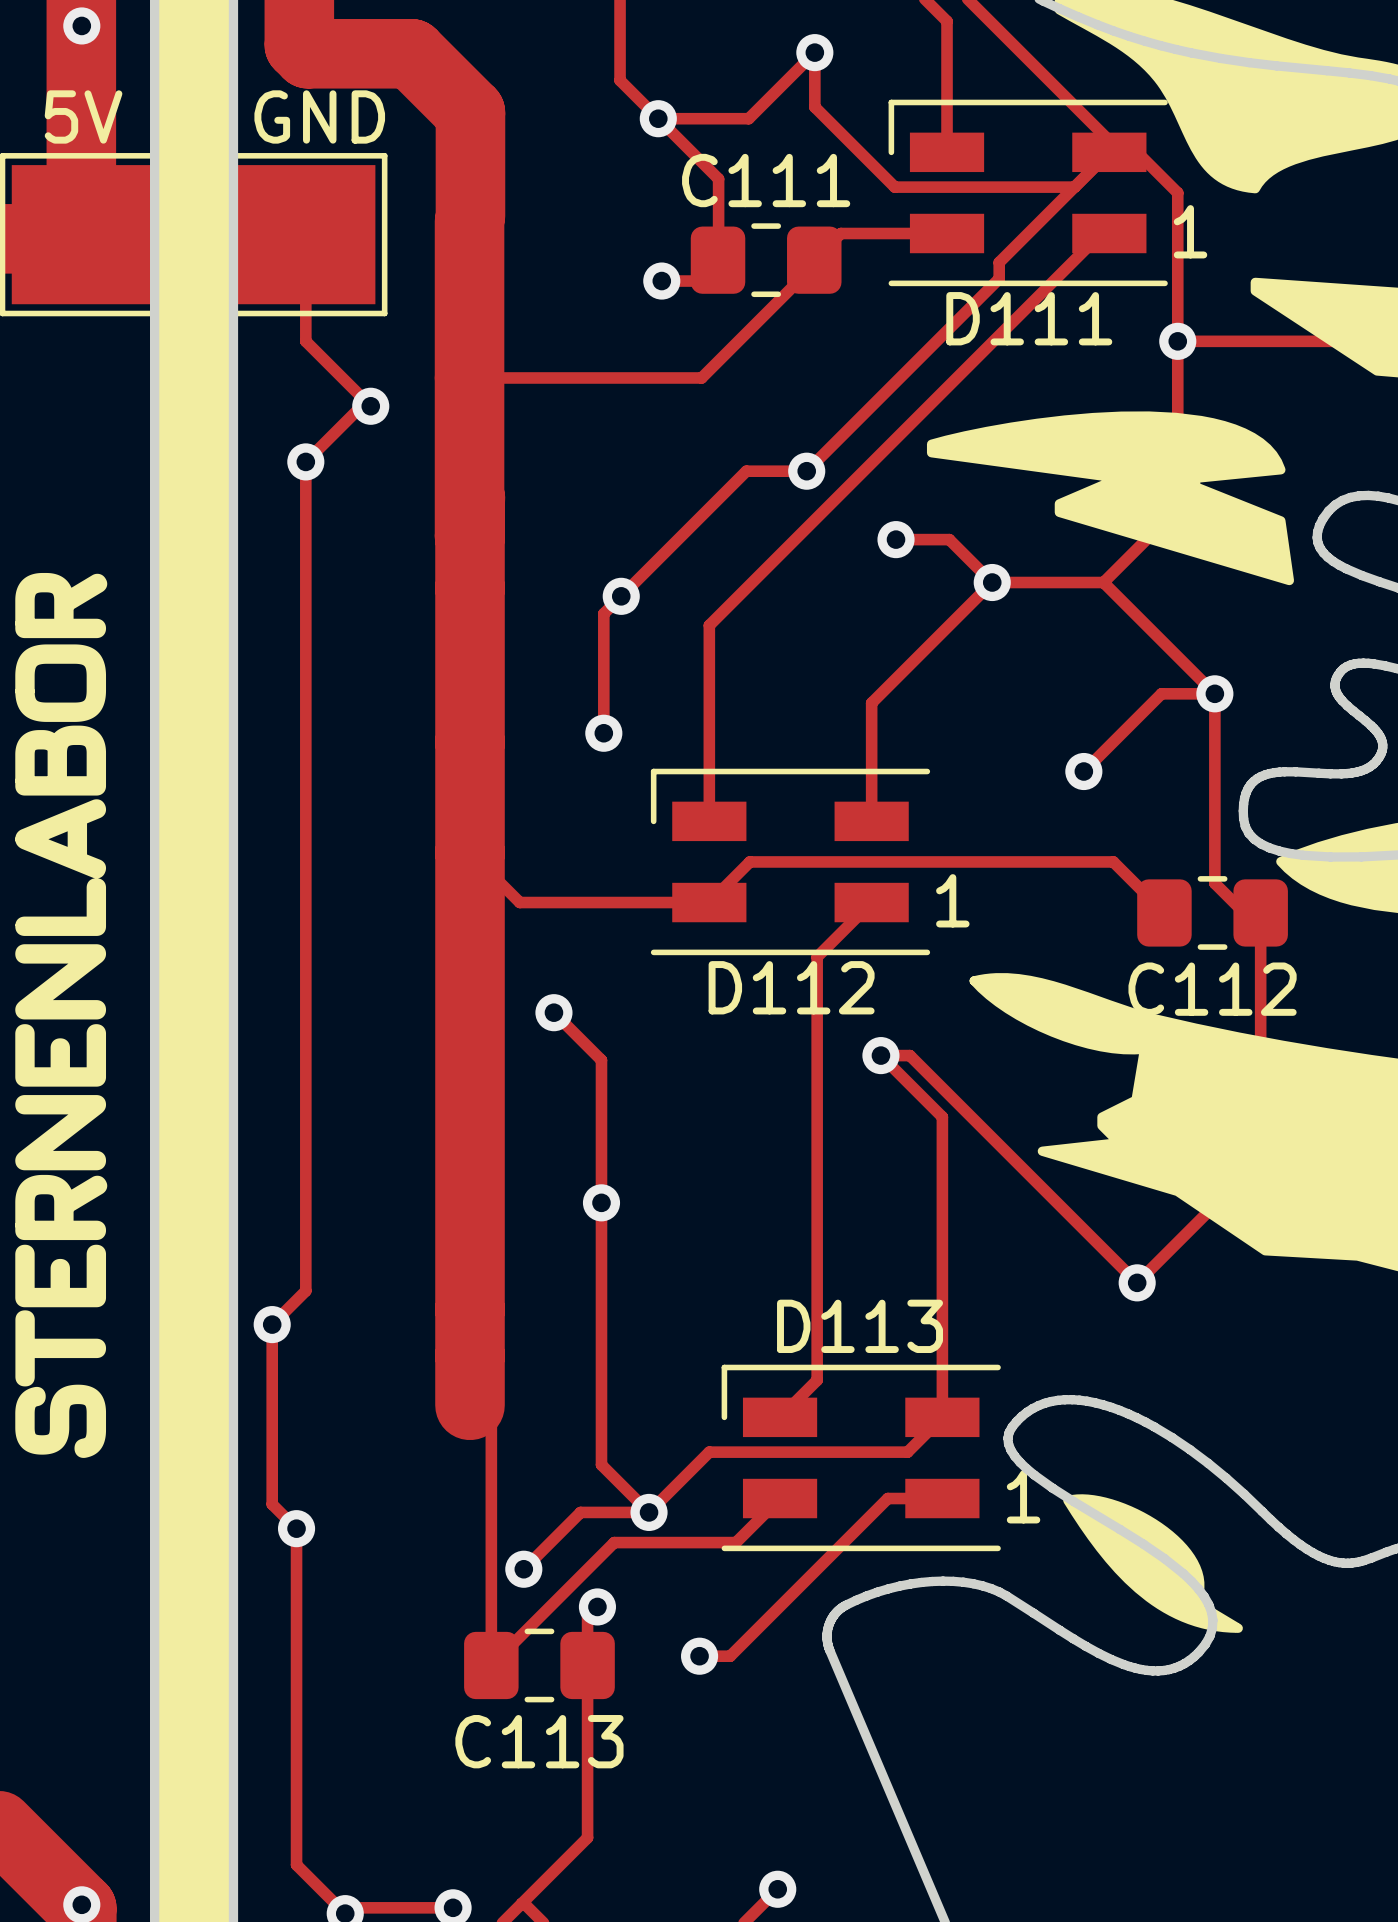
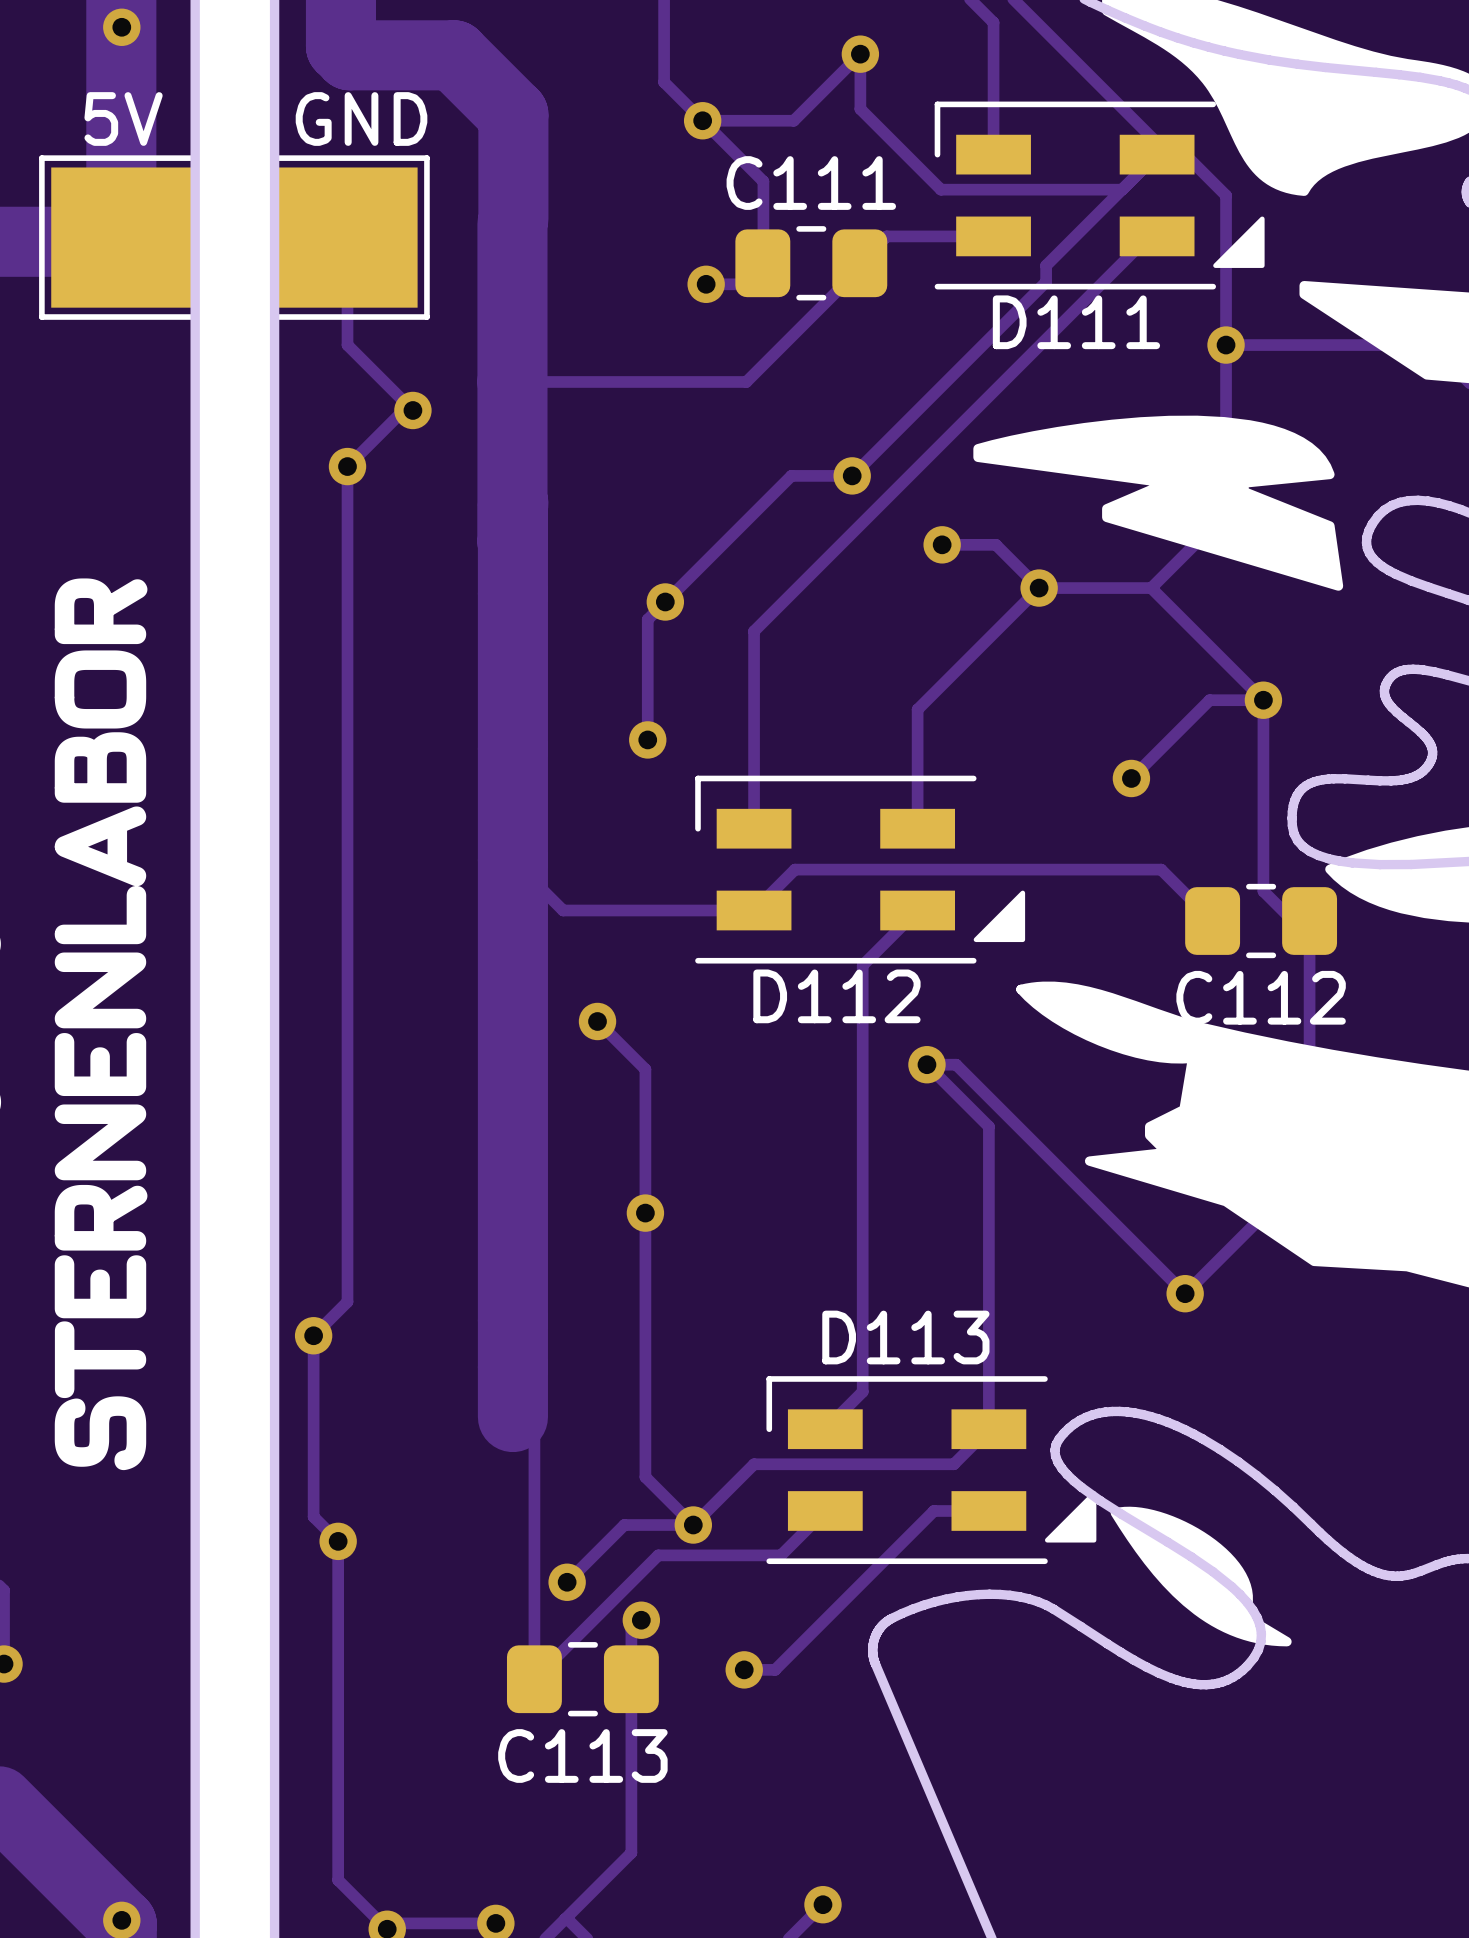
D111 footprint: [888, 99, 1168, 287] -> [934, 101, 1265, 290]
D112 footprint: [650, 768, 931, 956] -> [695, 775, 1026, 964]
D113 footprint: [721, 1364, 1001, 1552] -> [766, 1376, 1097, 1565]

